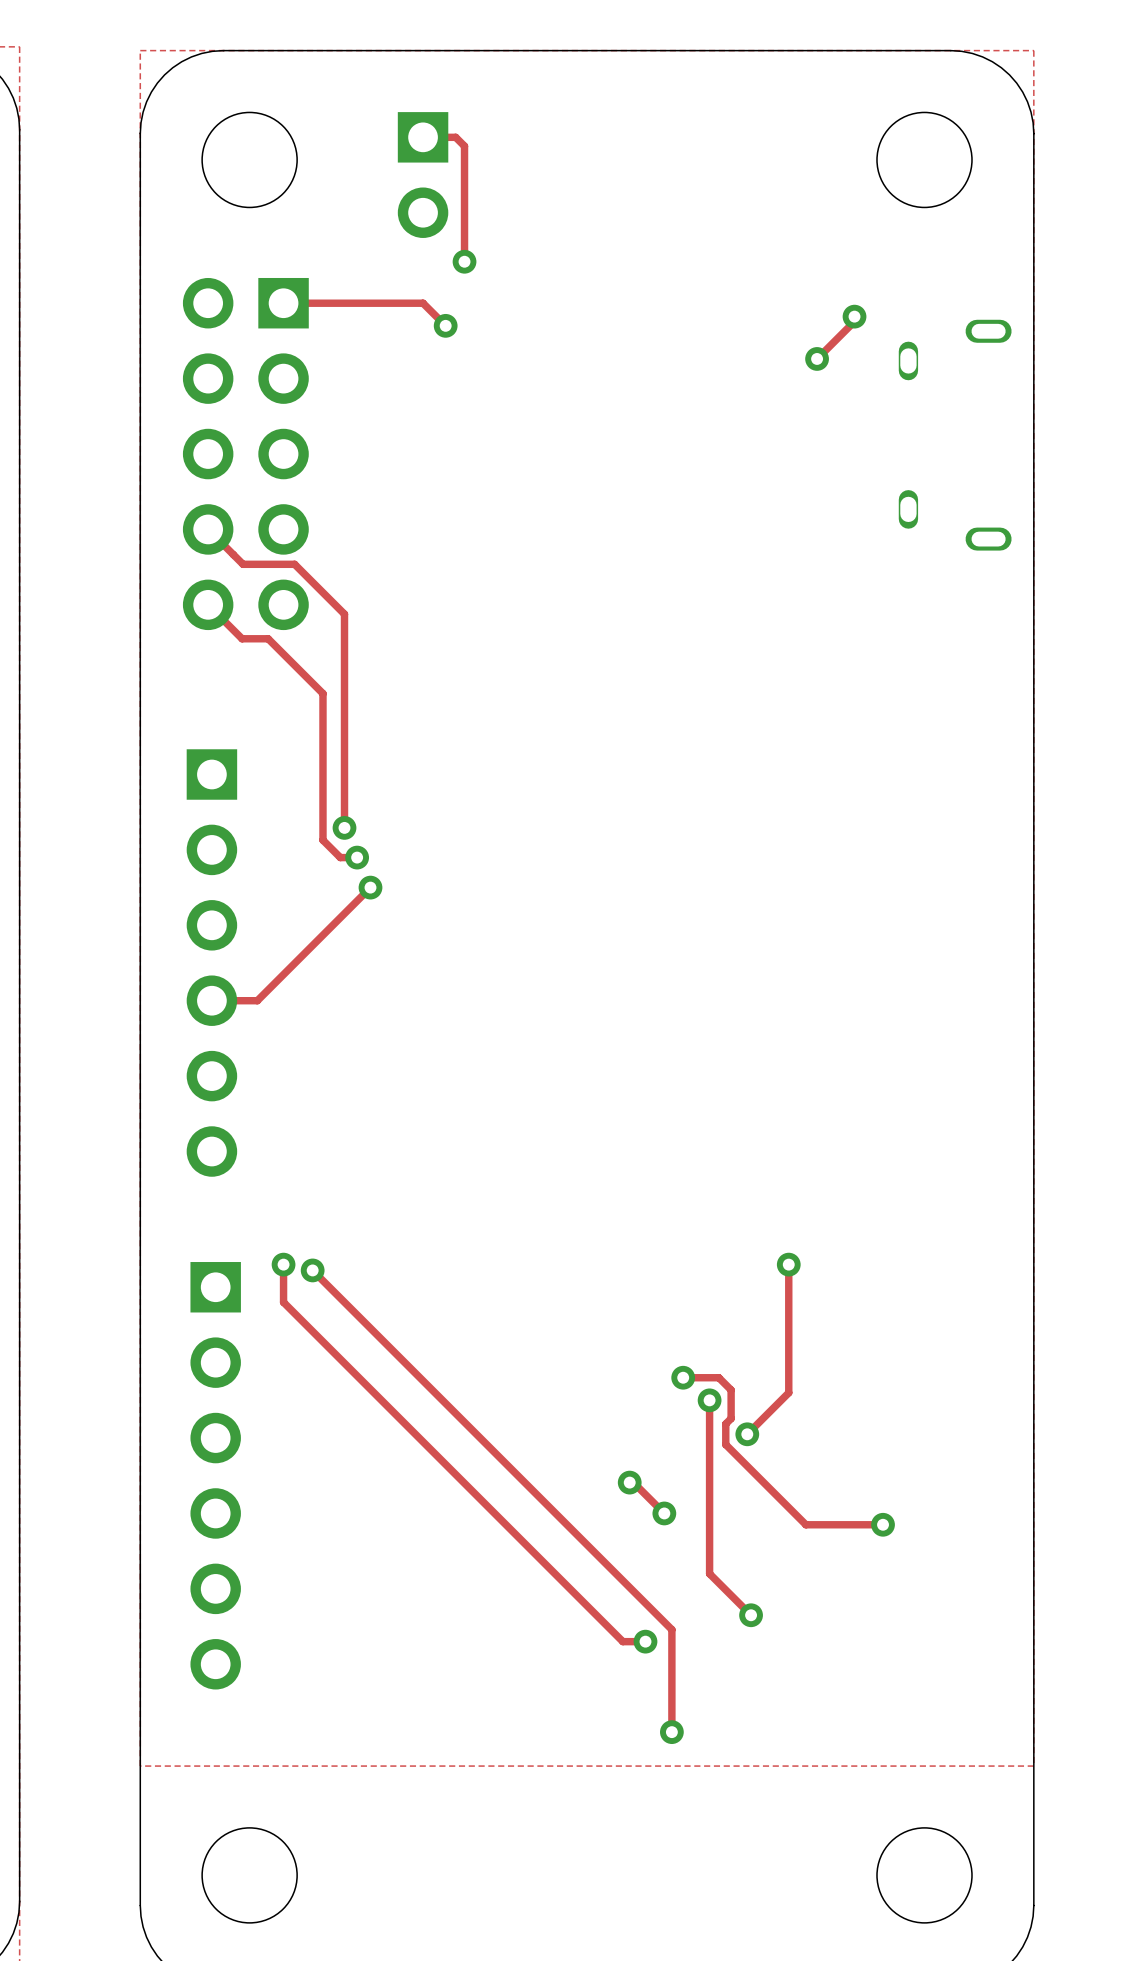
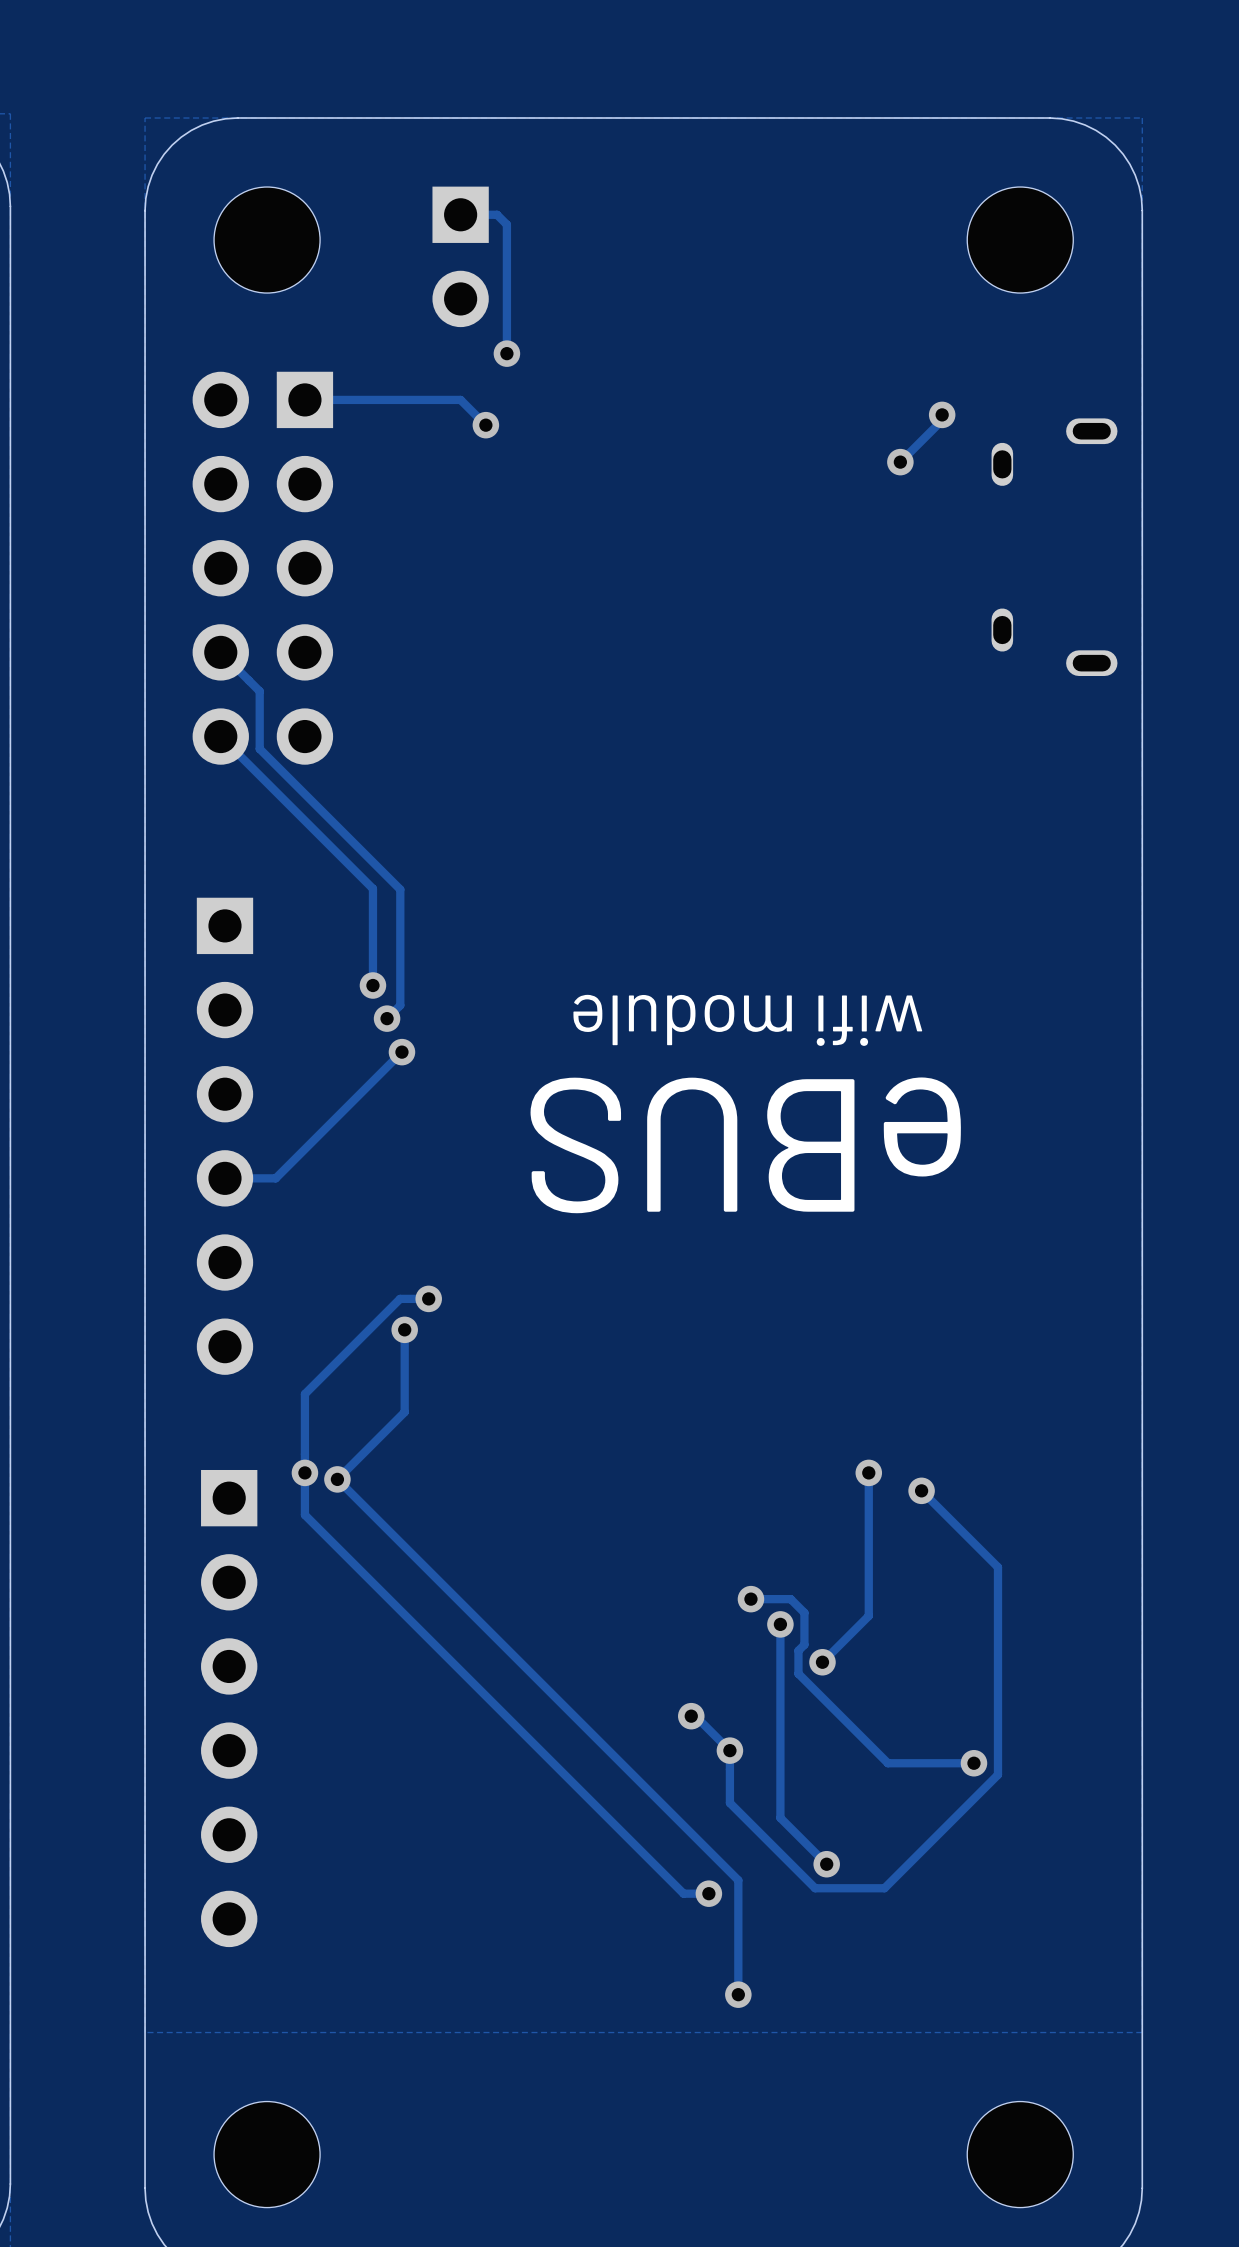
track: (243, 564) (294, 564) (344, 614) (344, 741) -> (258, 774) (372, 888)
track: (242, 638) (268, 638) (322, 693) (322, 840) (340, 857) (357, 857) -> (259, 691) (259, 748) (400, 889) (400, 1005) (387, 1018)
text: none -> wifi module (747, 1020)
text: none -> eBUS (745, 1145)
track: none -> (428, 1298) (400, 1298) (304, 1394) (304, 1472)
via: none -> (428, 1298)
track: none -> (404, 1329) (404, 1412) (337, 1479)
via: none -> (404, 1329)
track: none -> (921, 1490) (997, 1567) (997, 1774) (884, 1888) (815, 1888) (729, 1803) (729, 1750)
via: none -> (921, 1490)

